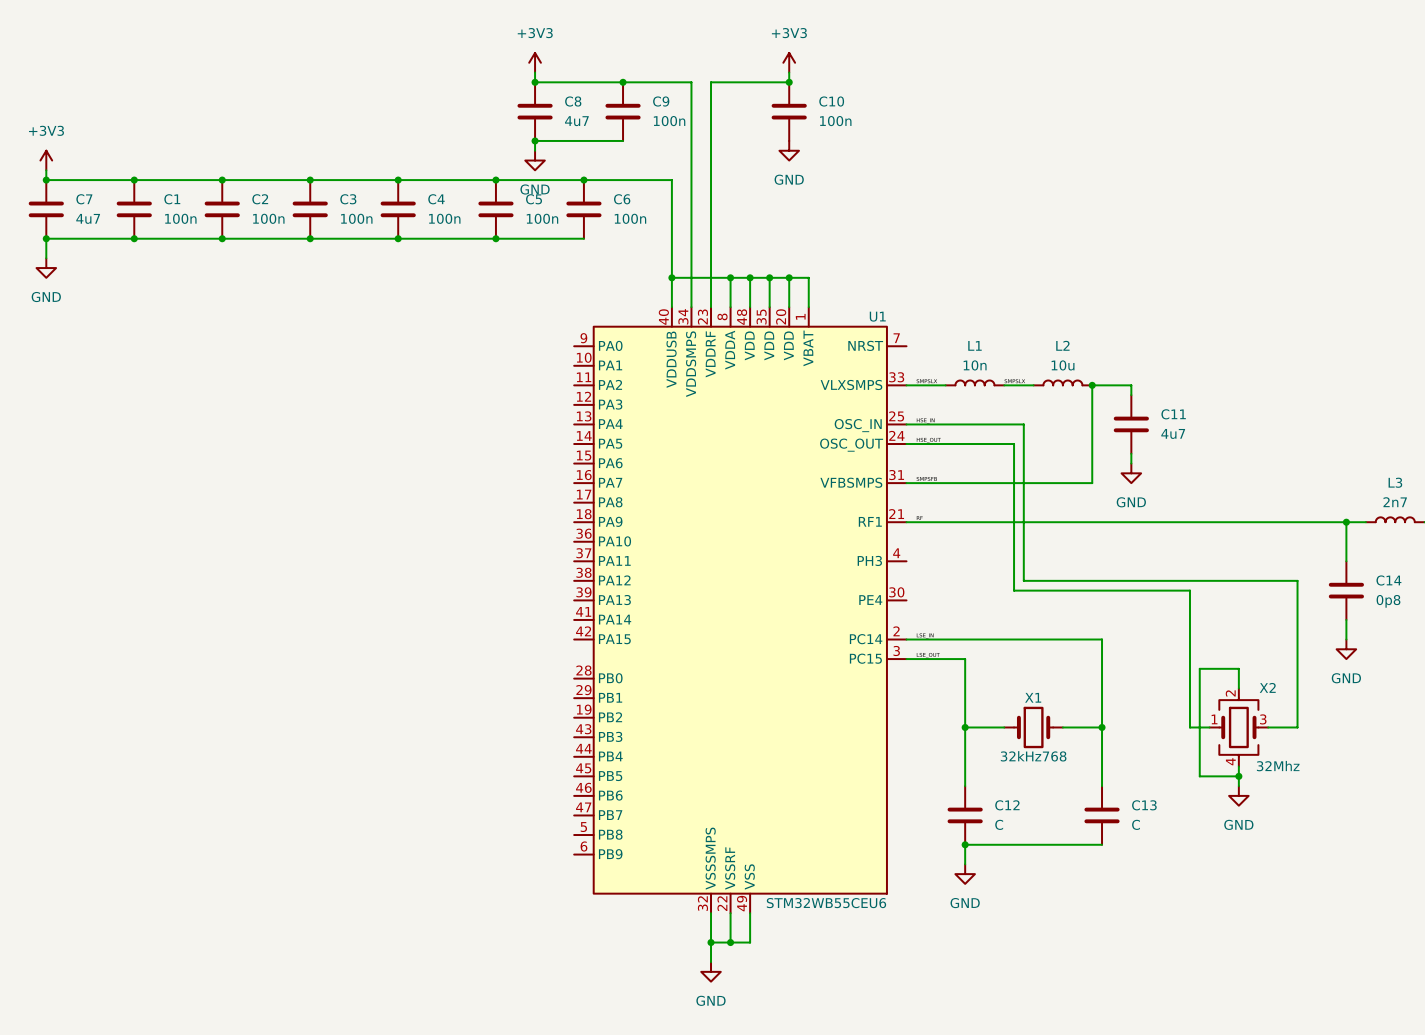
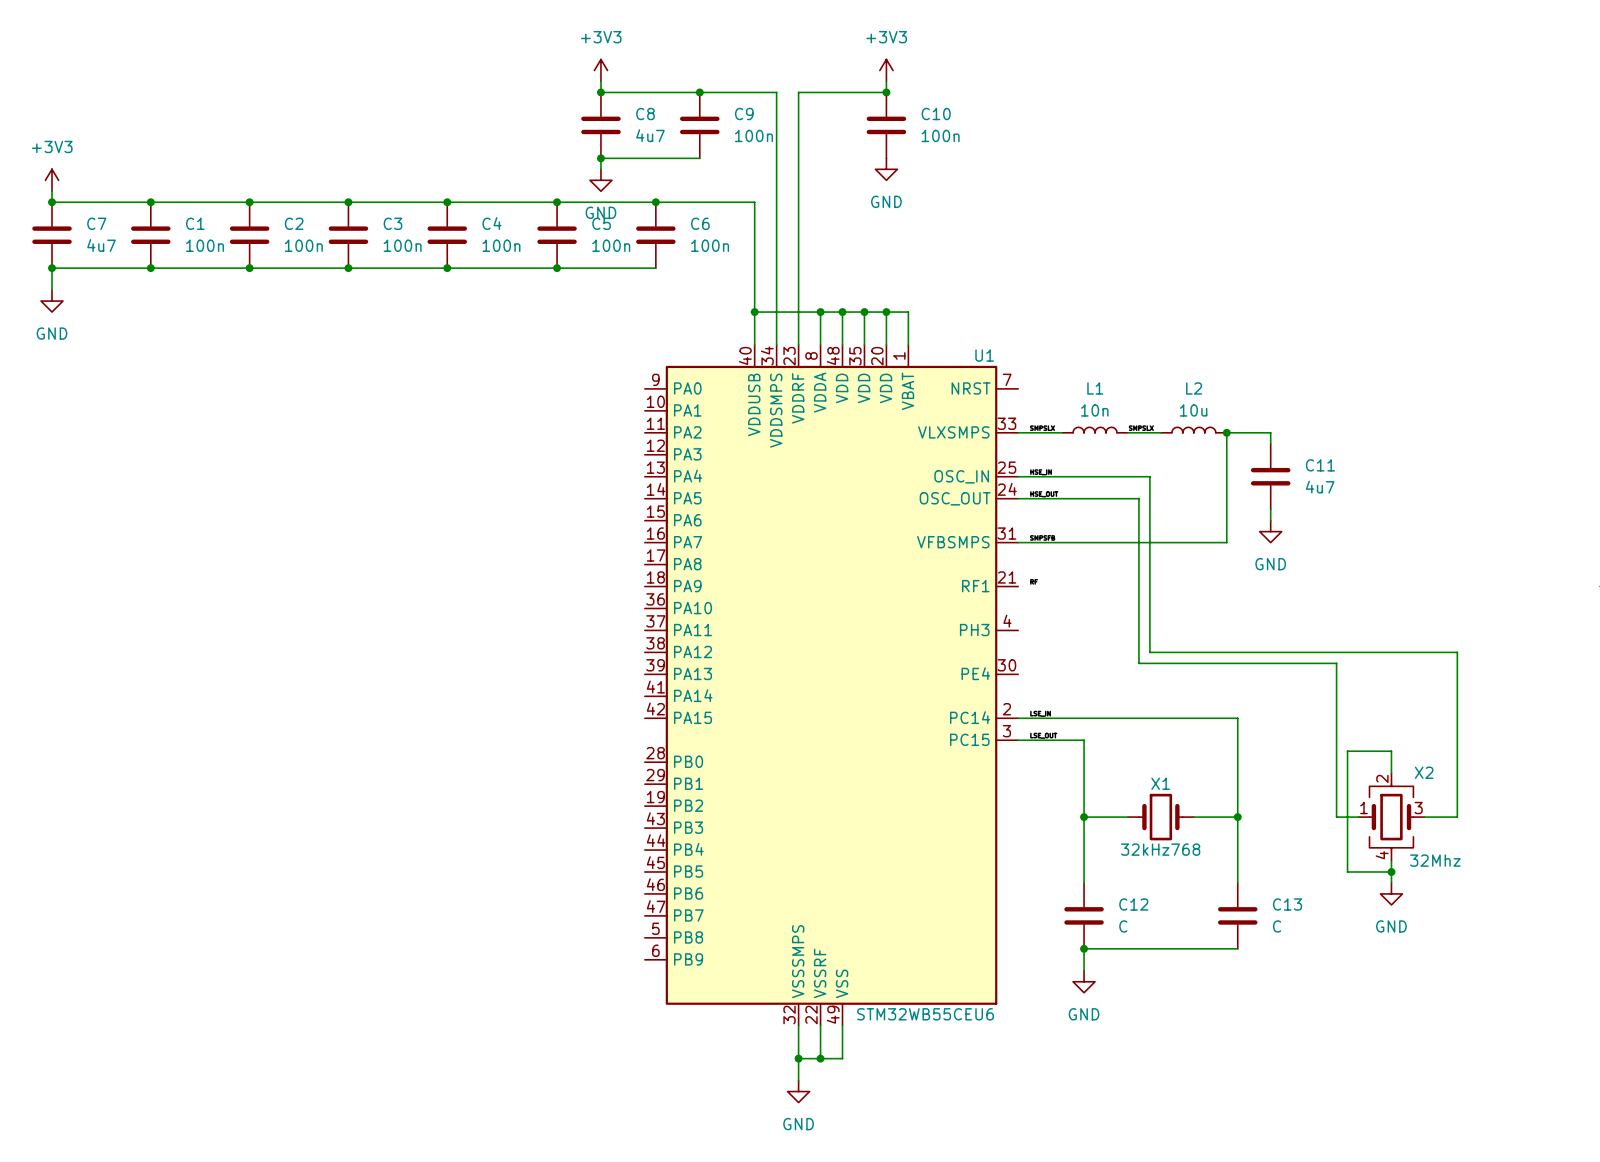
L3: 2n7 (1395, 519) -> none
wire: (906, 522) (1365, 522) -> none
wire: (1346, 522) (1346, 561) -> none
junction: (1346, 522) -> none
C14: 0p8 (1346, 590) -> none
wire: (1346, 619) (1346, 639) -> none
power symbol: GND (1346, 649) -> none

